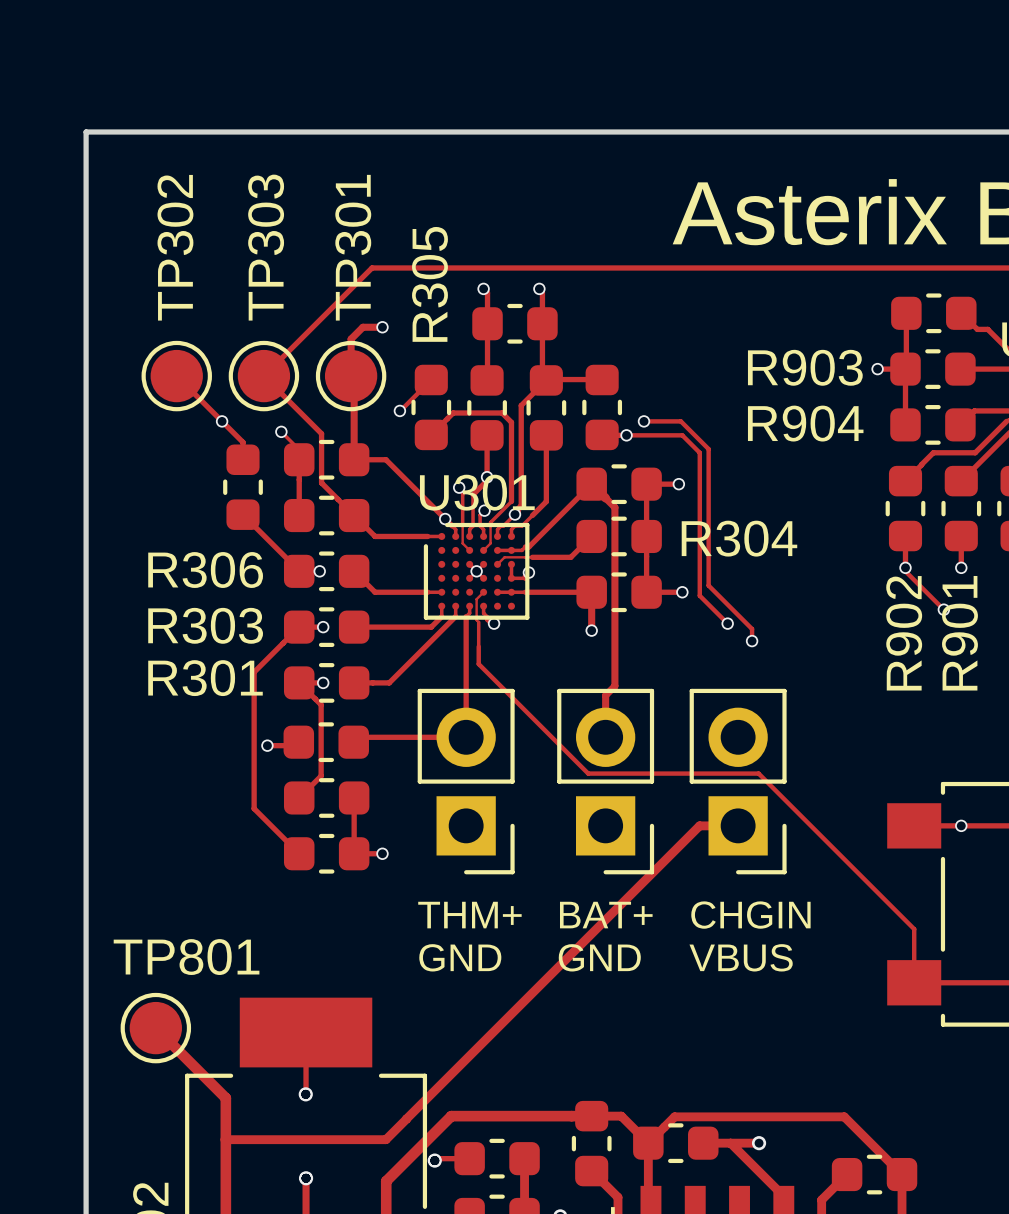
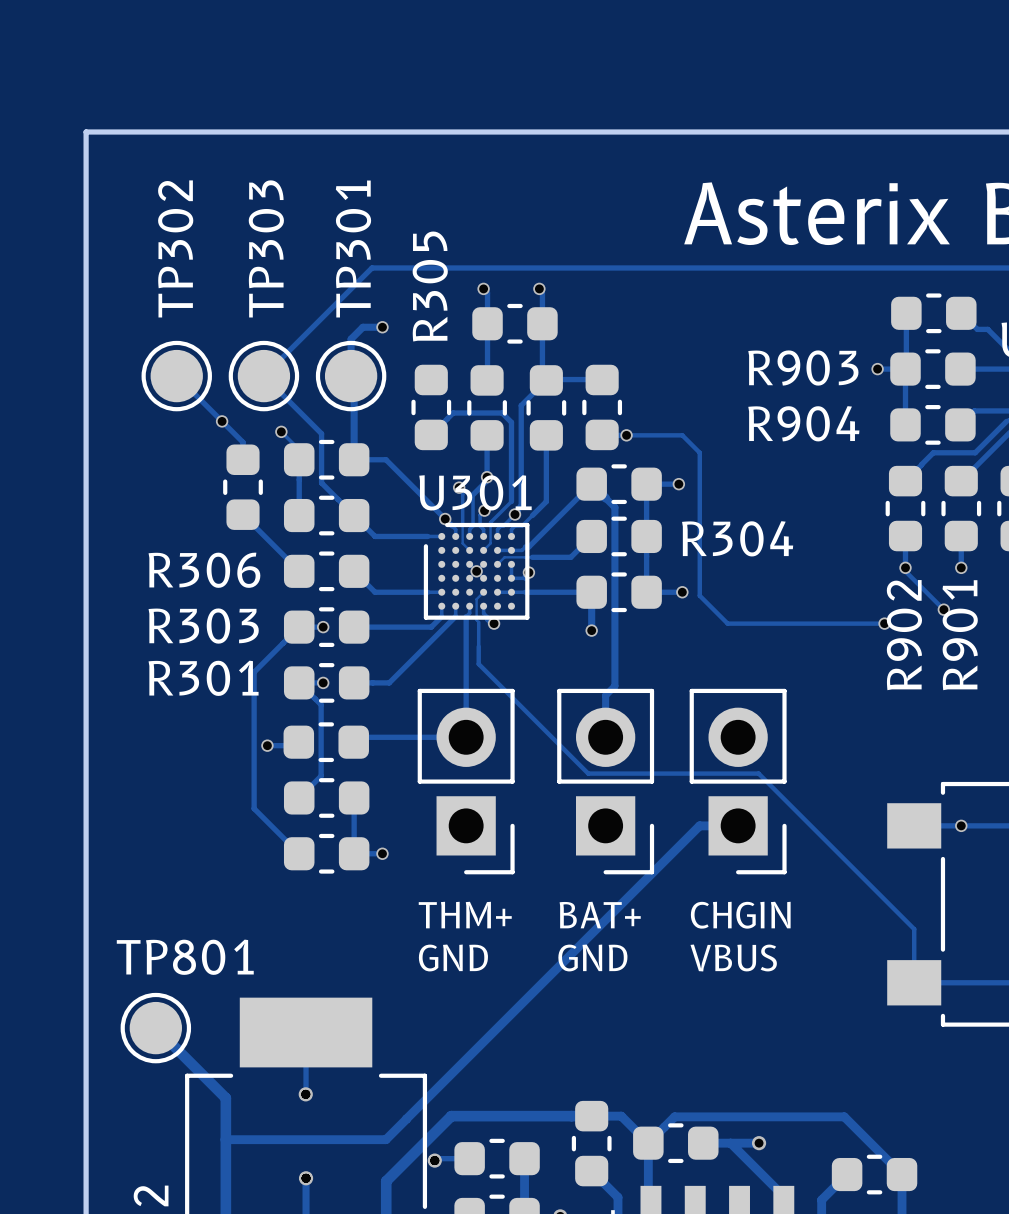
track: (431, 379) (400, 410) -> none
via: (399, 410) -> none
track: (643, 421) (680, 421) (708, 449) (708, 585) (752, 629) (752, 641) -> none
via: (643, 421) -> none
via: (319, 571) -> none
track: none -> (727, 623) (884, 623)
via: (727, 623) -> none
via: none -> (884, 623)
via: (752, 641) -> none

